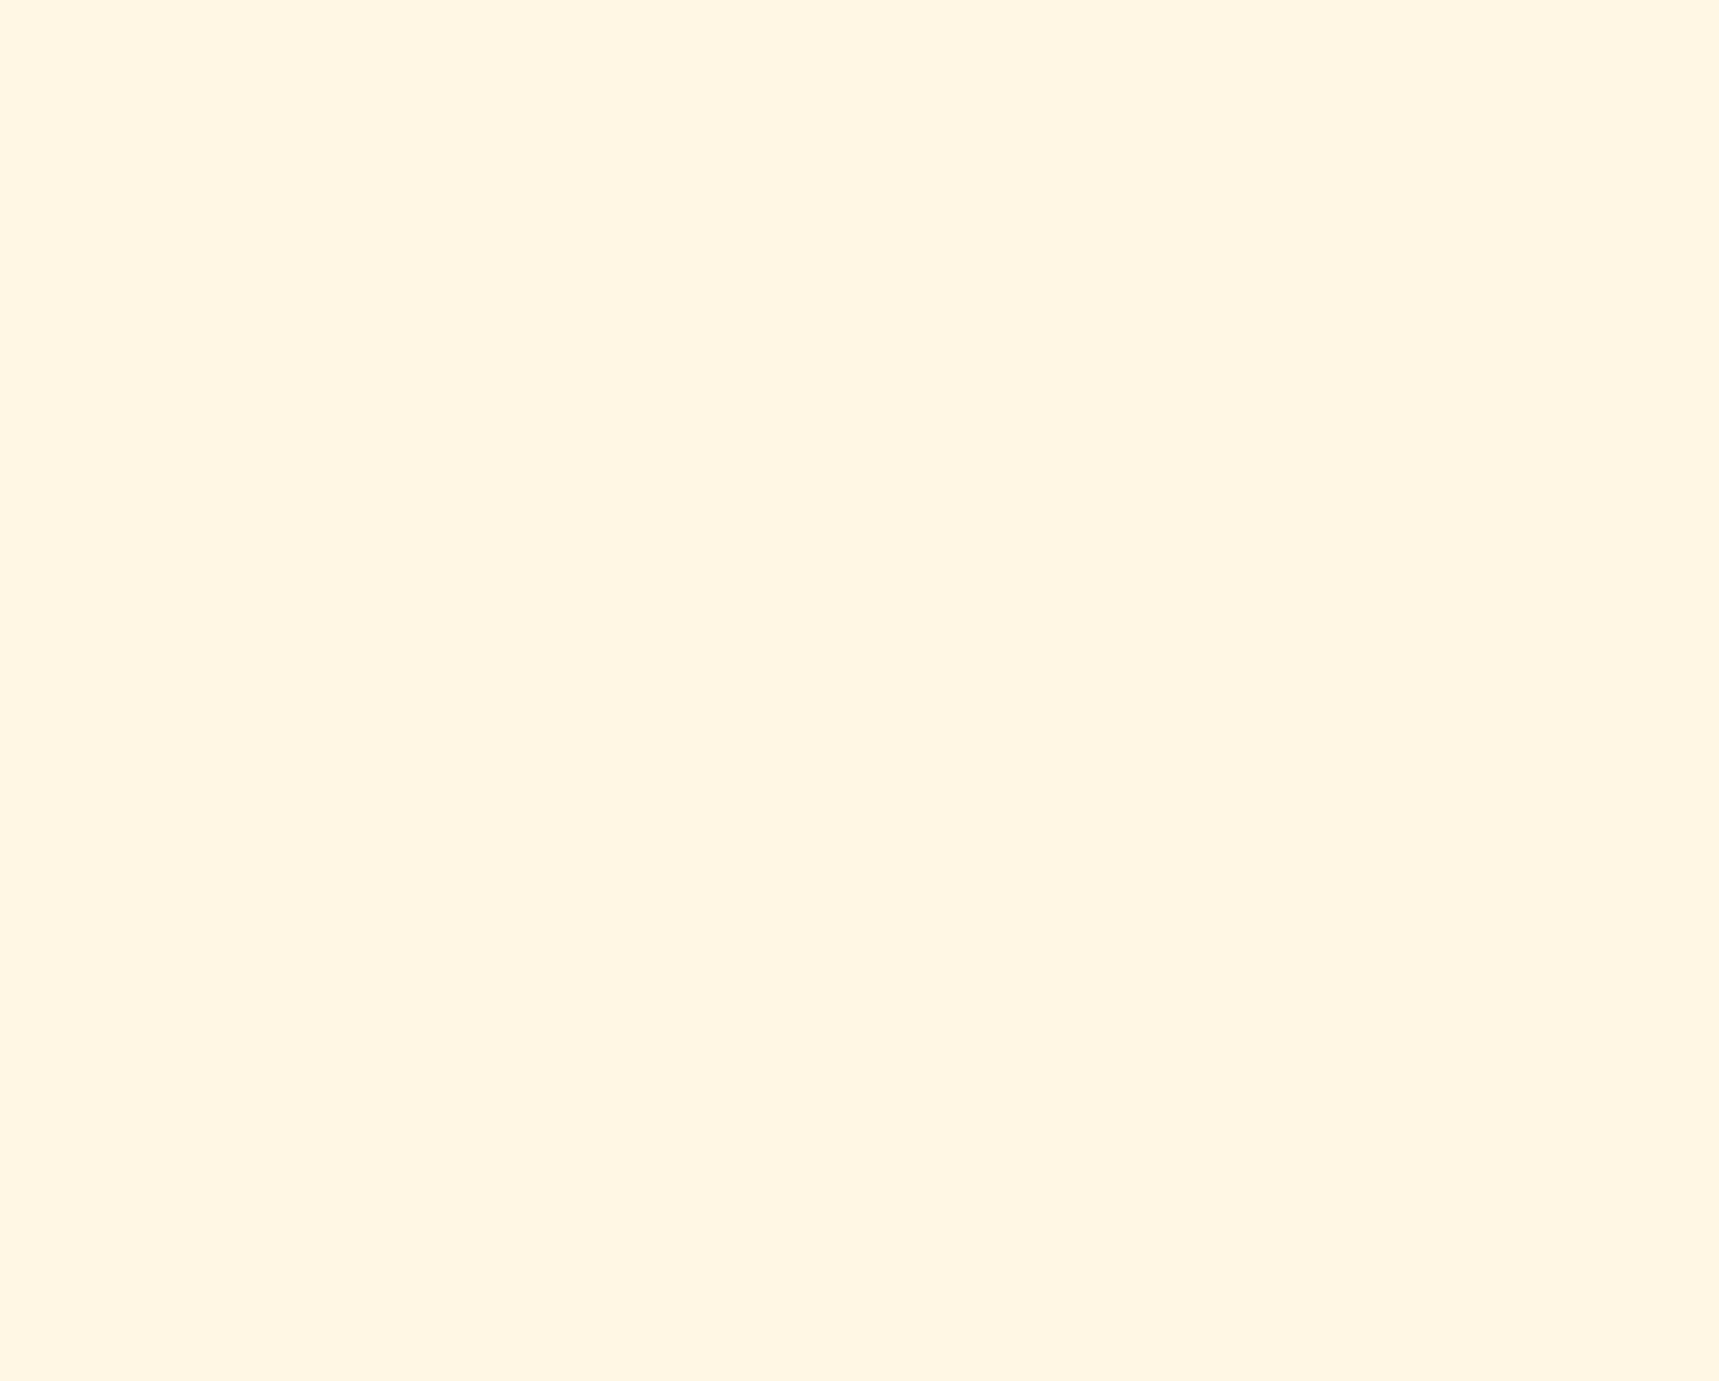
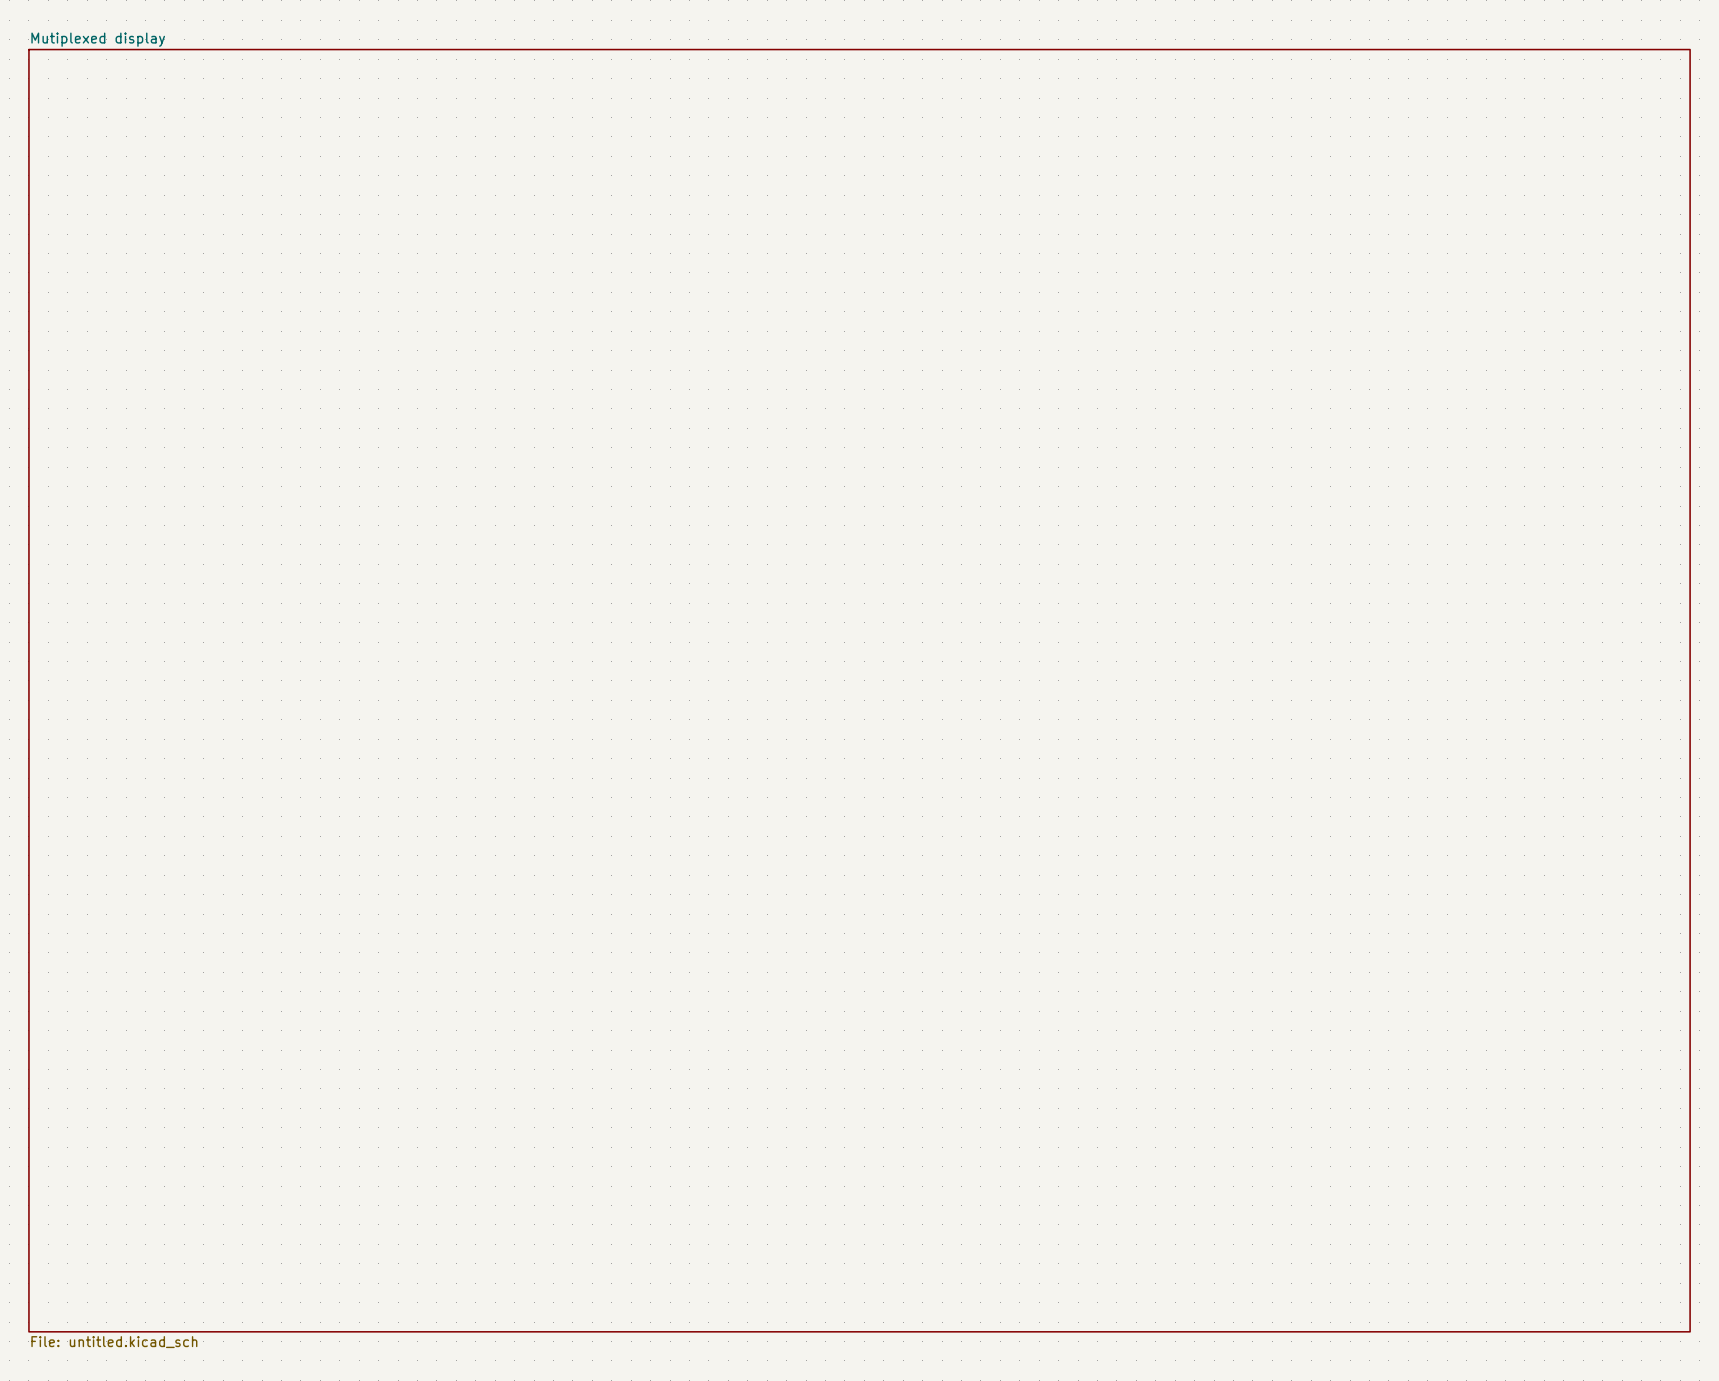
sheet Mutiplexed display: none -> File: untitled.kicad_sch (859, 690)

